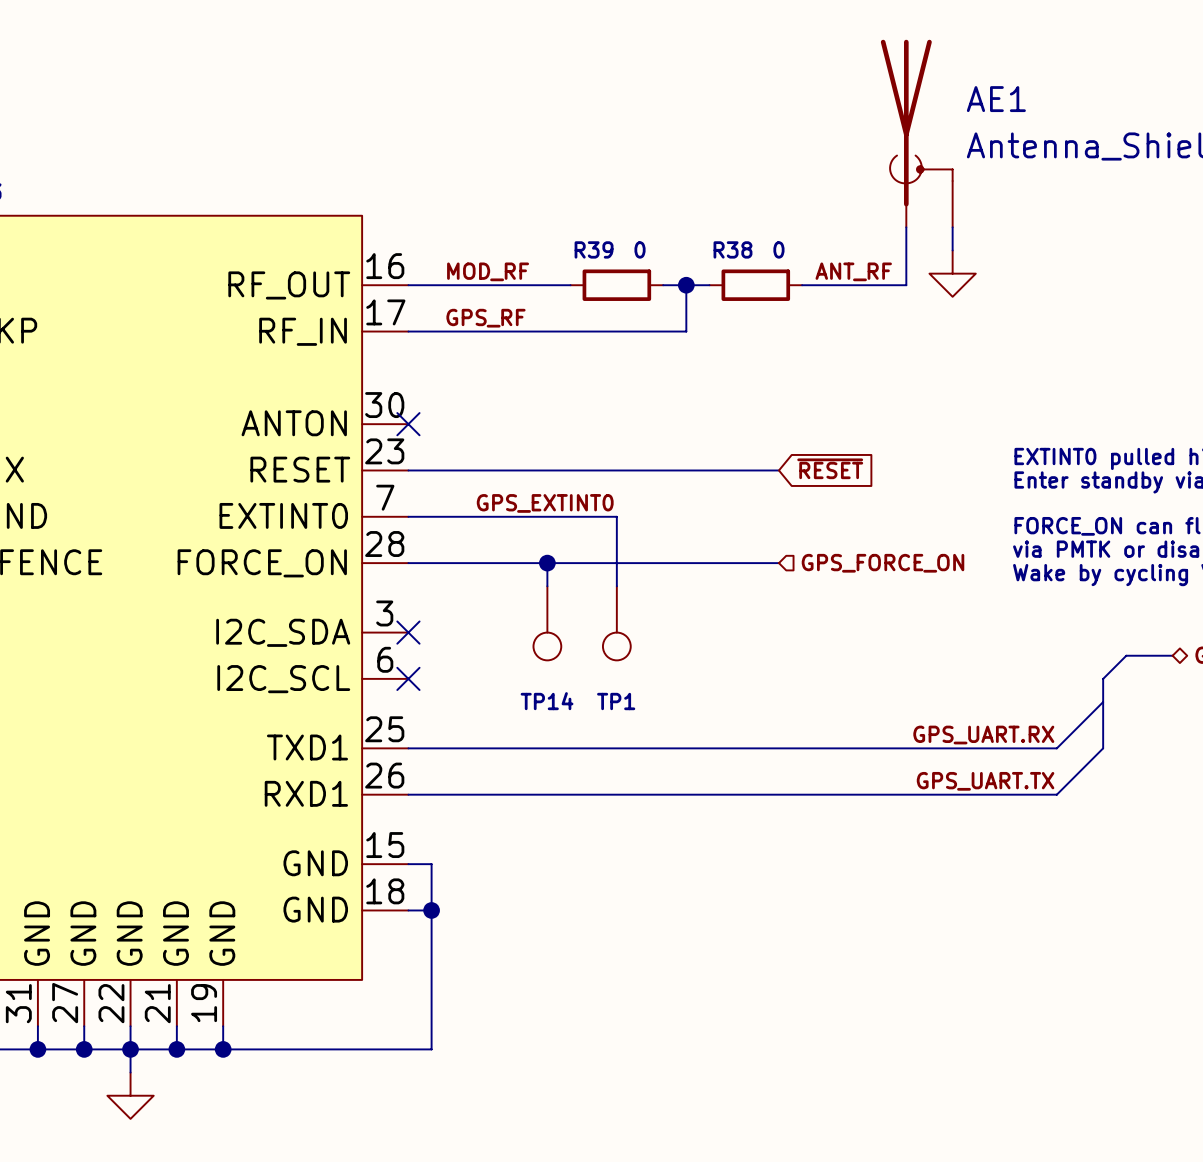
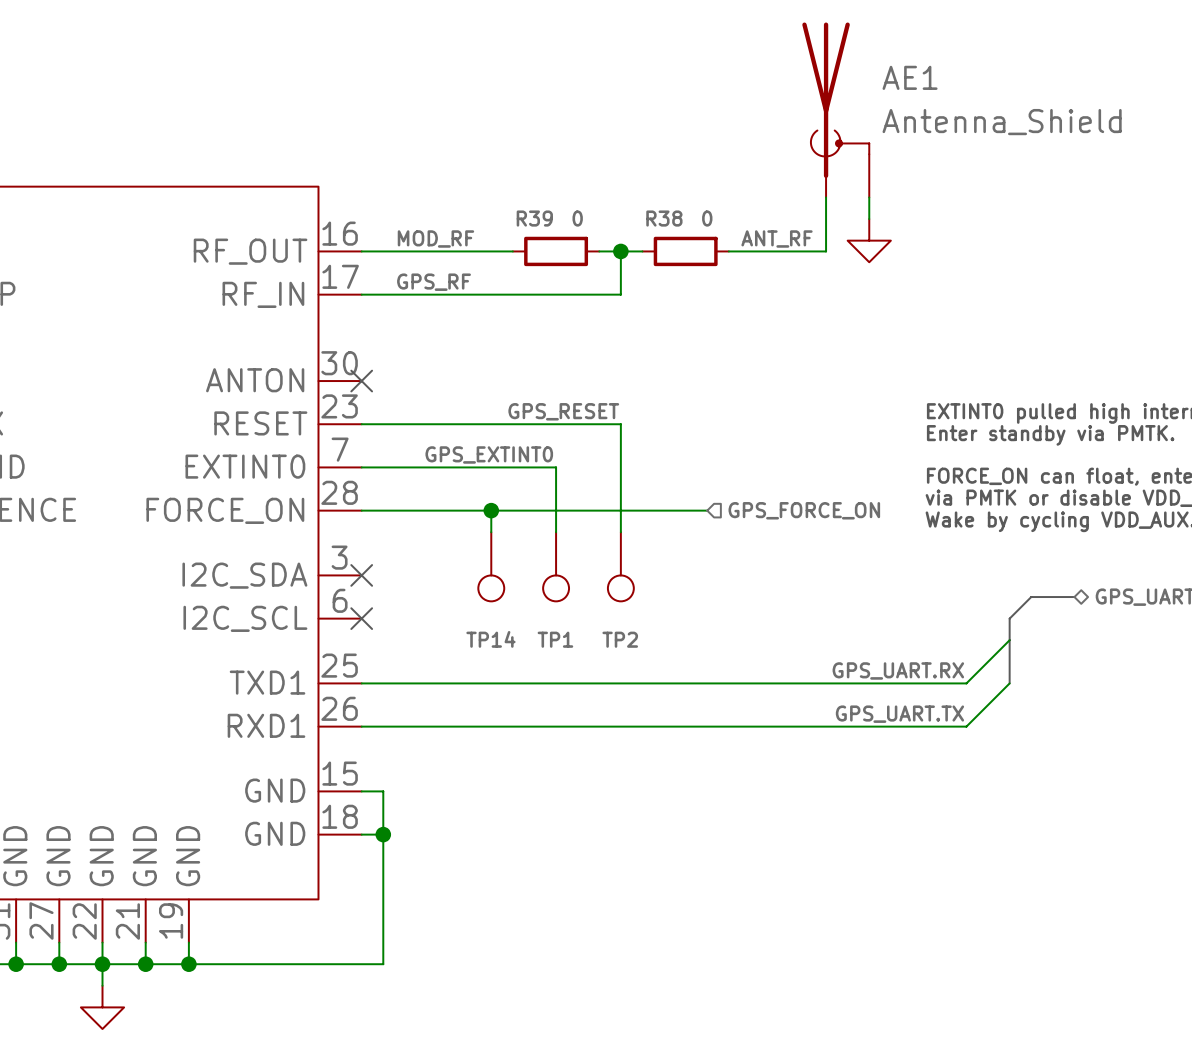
label: none -> GPS_RESET (563, 411)
global label: ~{RESET} (830, 468) -> none
wire: (686, 470) (778, 470) -> (620, 424) (620, 532)
TP2: none -> (620, 566)

